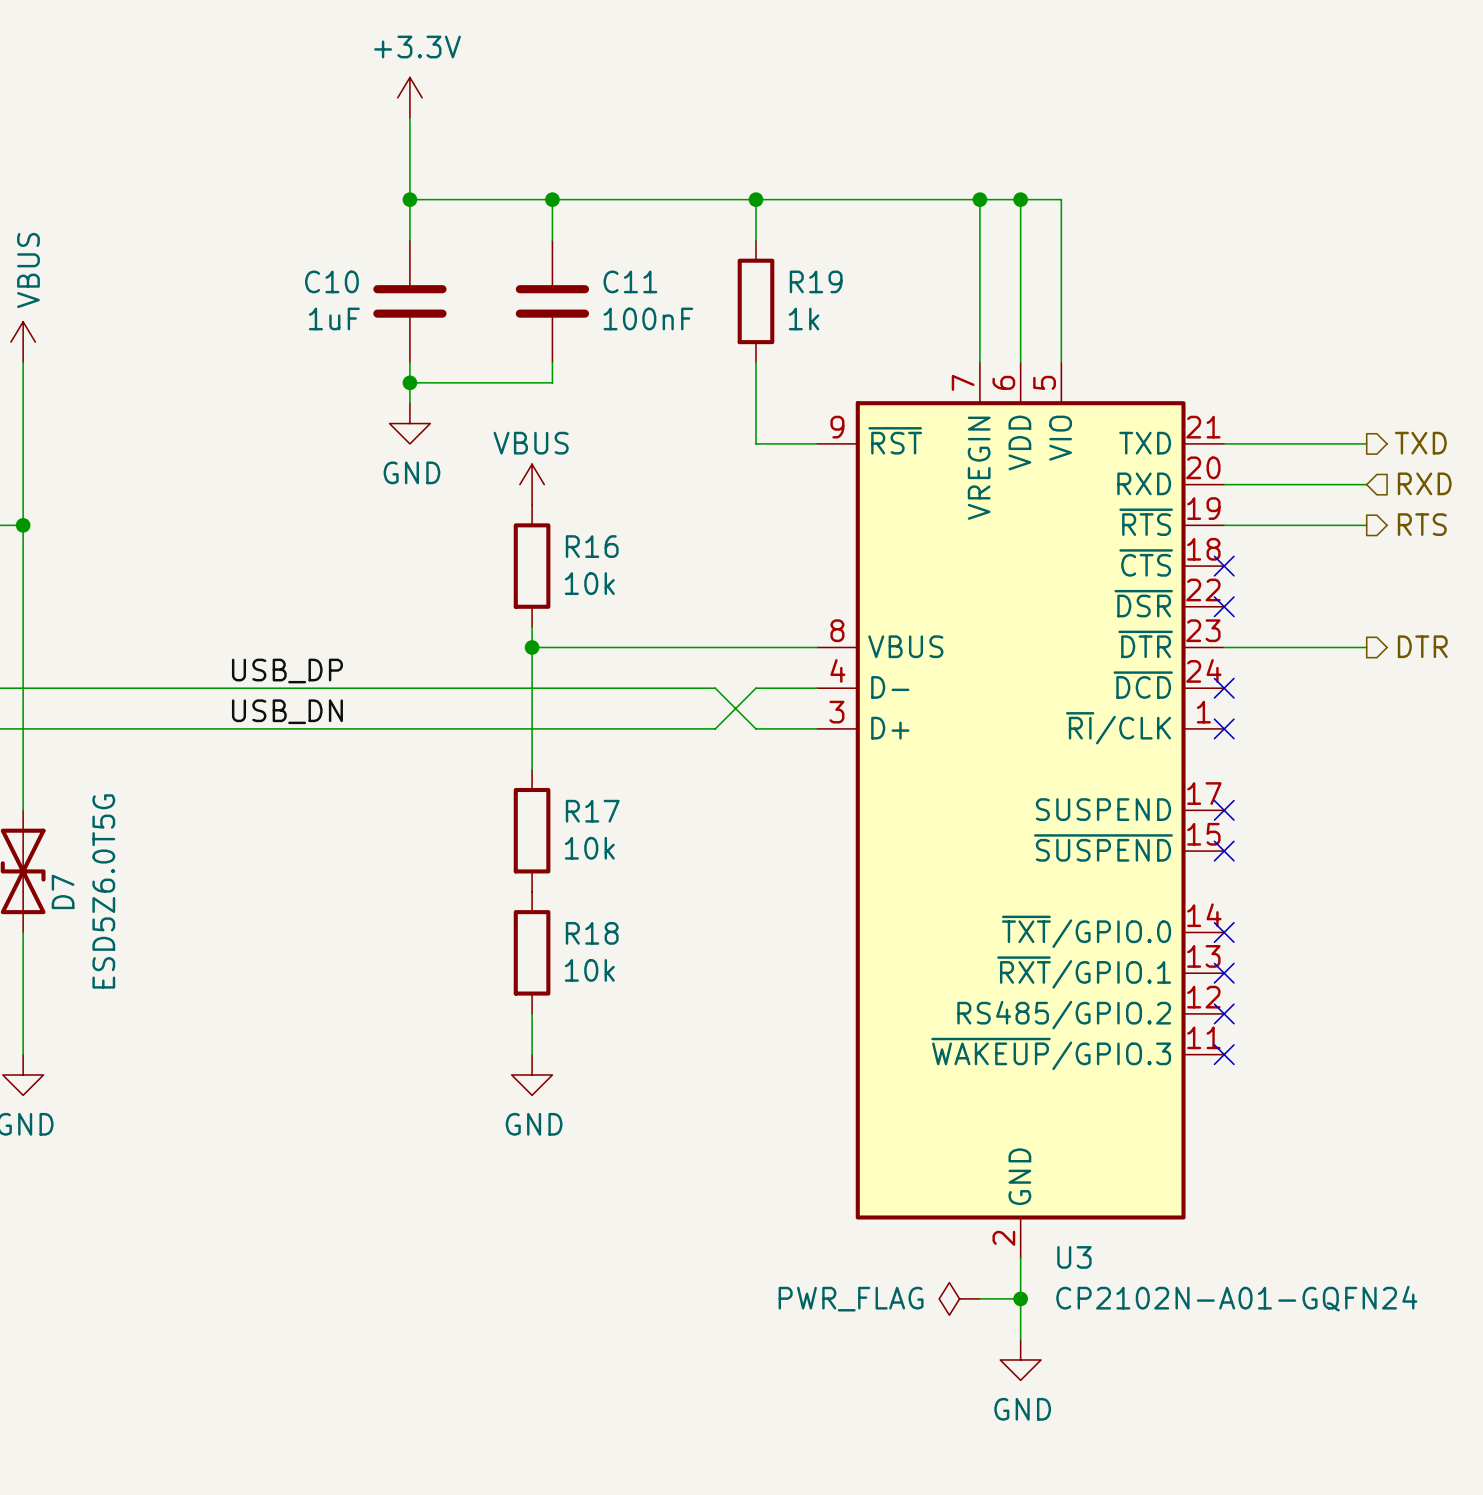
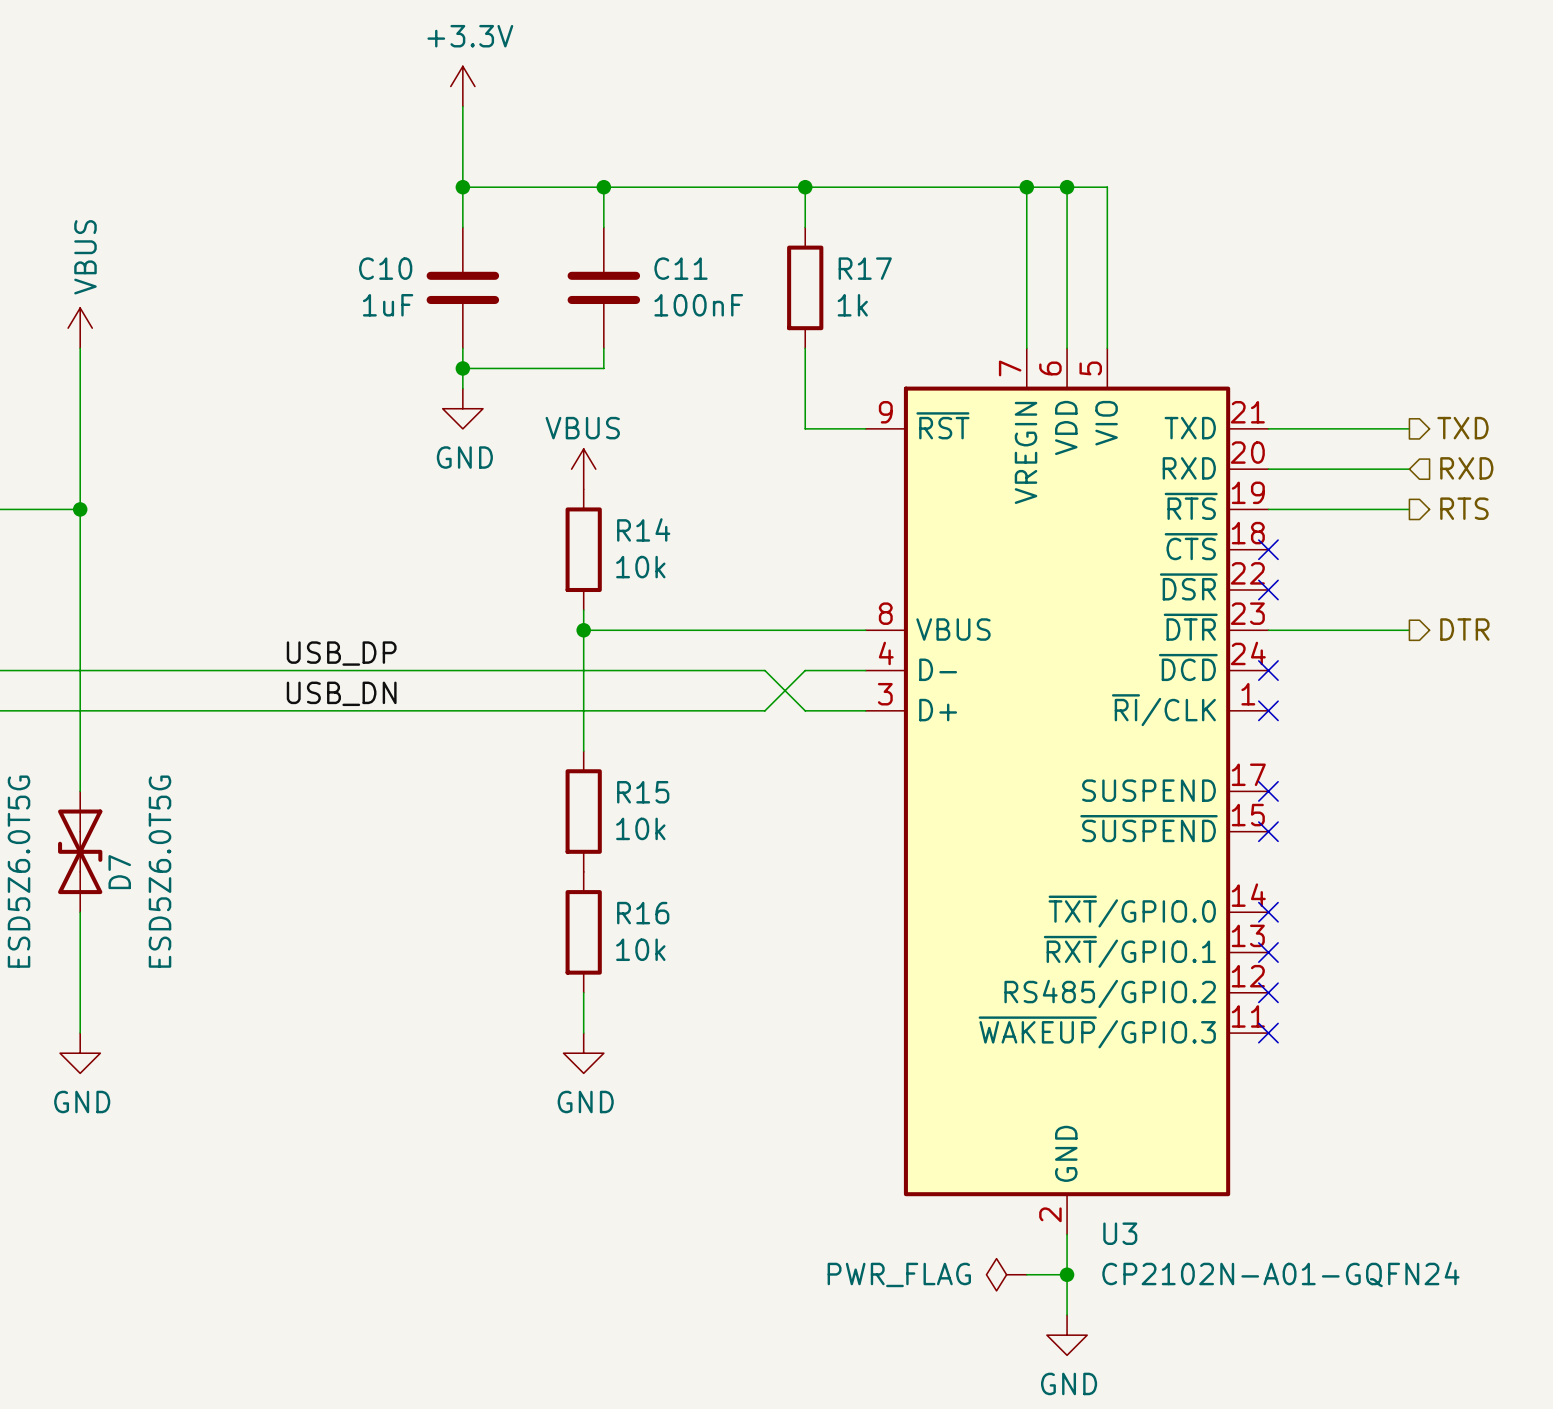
R19 name: R19 (816, 281) -> R17 (865, 268)
R16 name: R16 (592, 546) -> R14 (643, 529)
R17 name: R17 (592, 811) -> R15 (643, 792)
R18 name: R18 (592, 933) -> R16 (643, 913)

